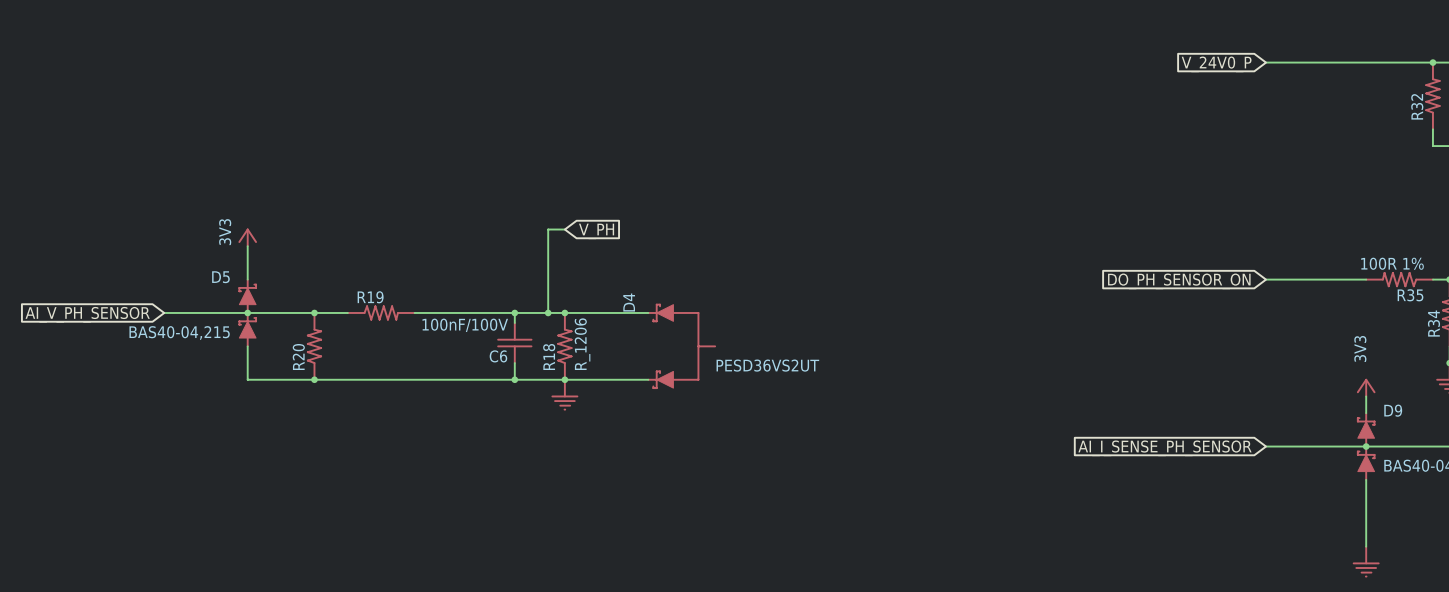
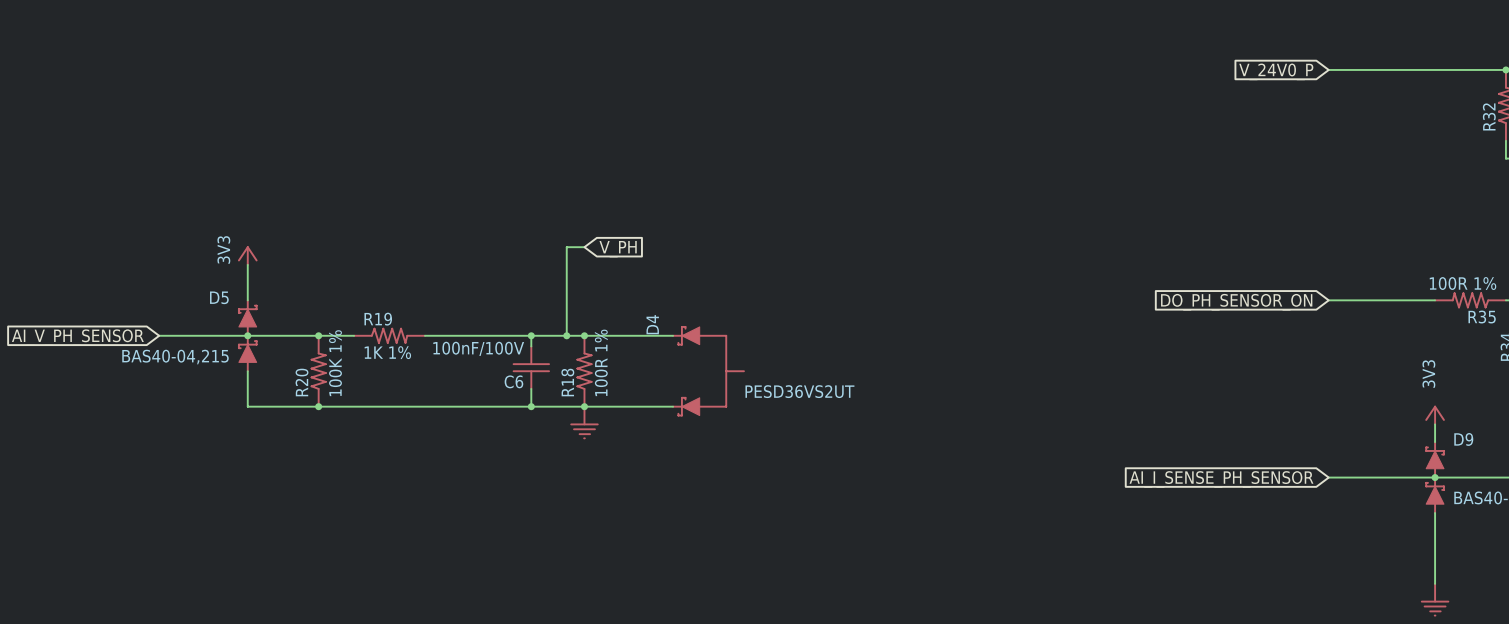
R19 value: none -> 1K 1% (387, 352)
R20 value: none -> 100K 1% (335, 363)
R18 value: R_1206 (582, 344) -> 100R 1% (601, 362)

